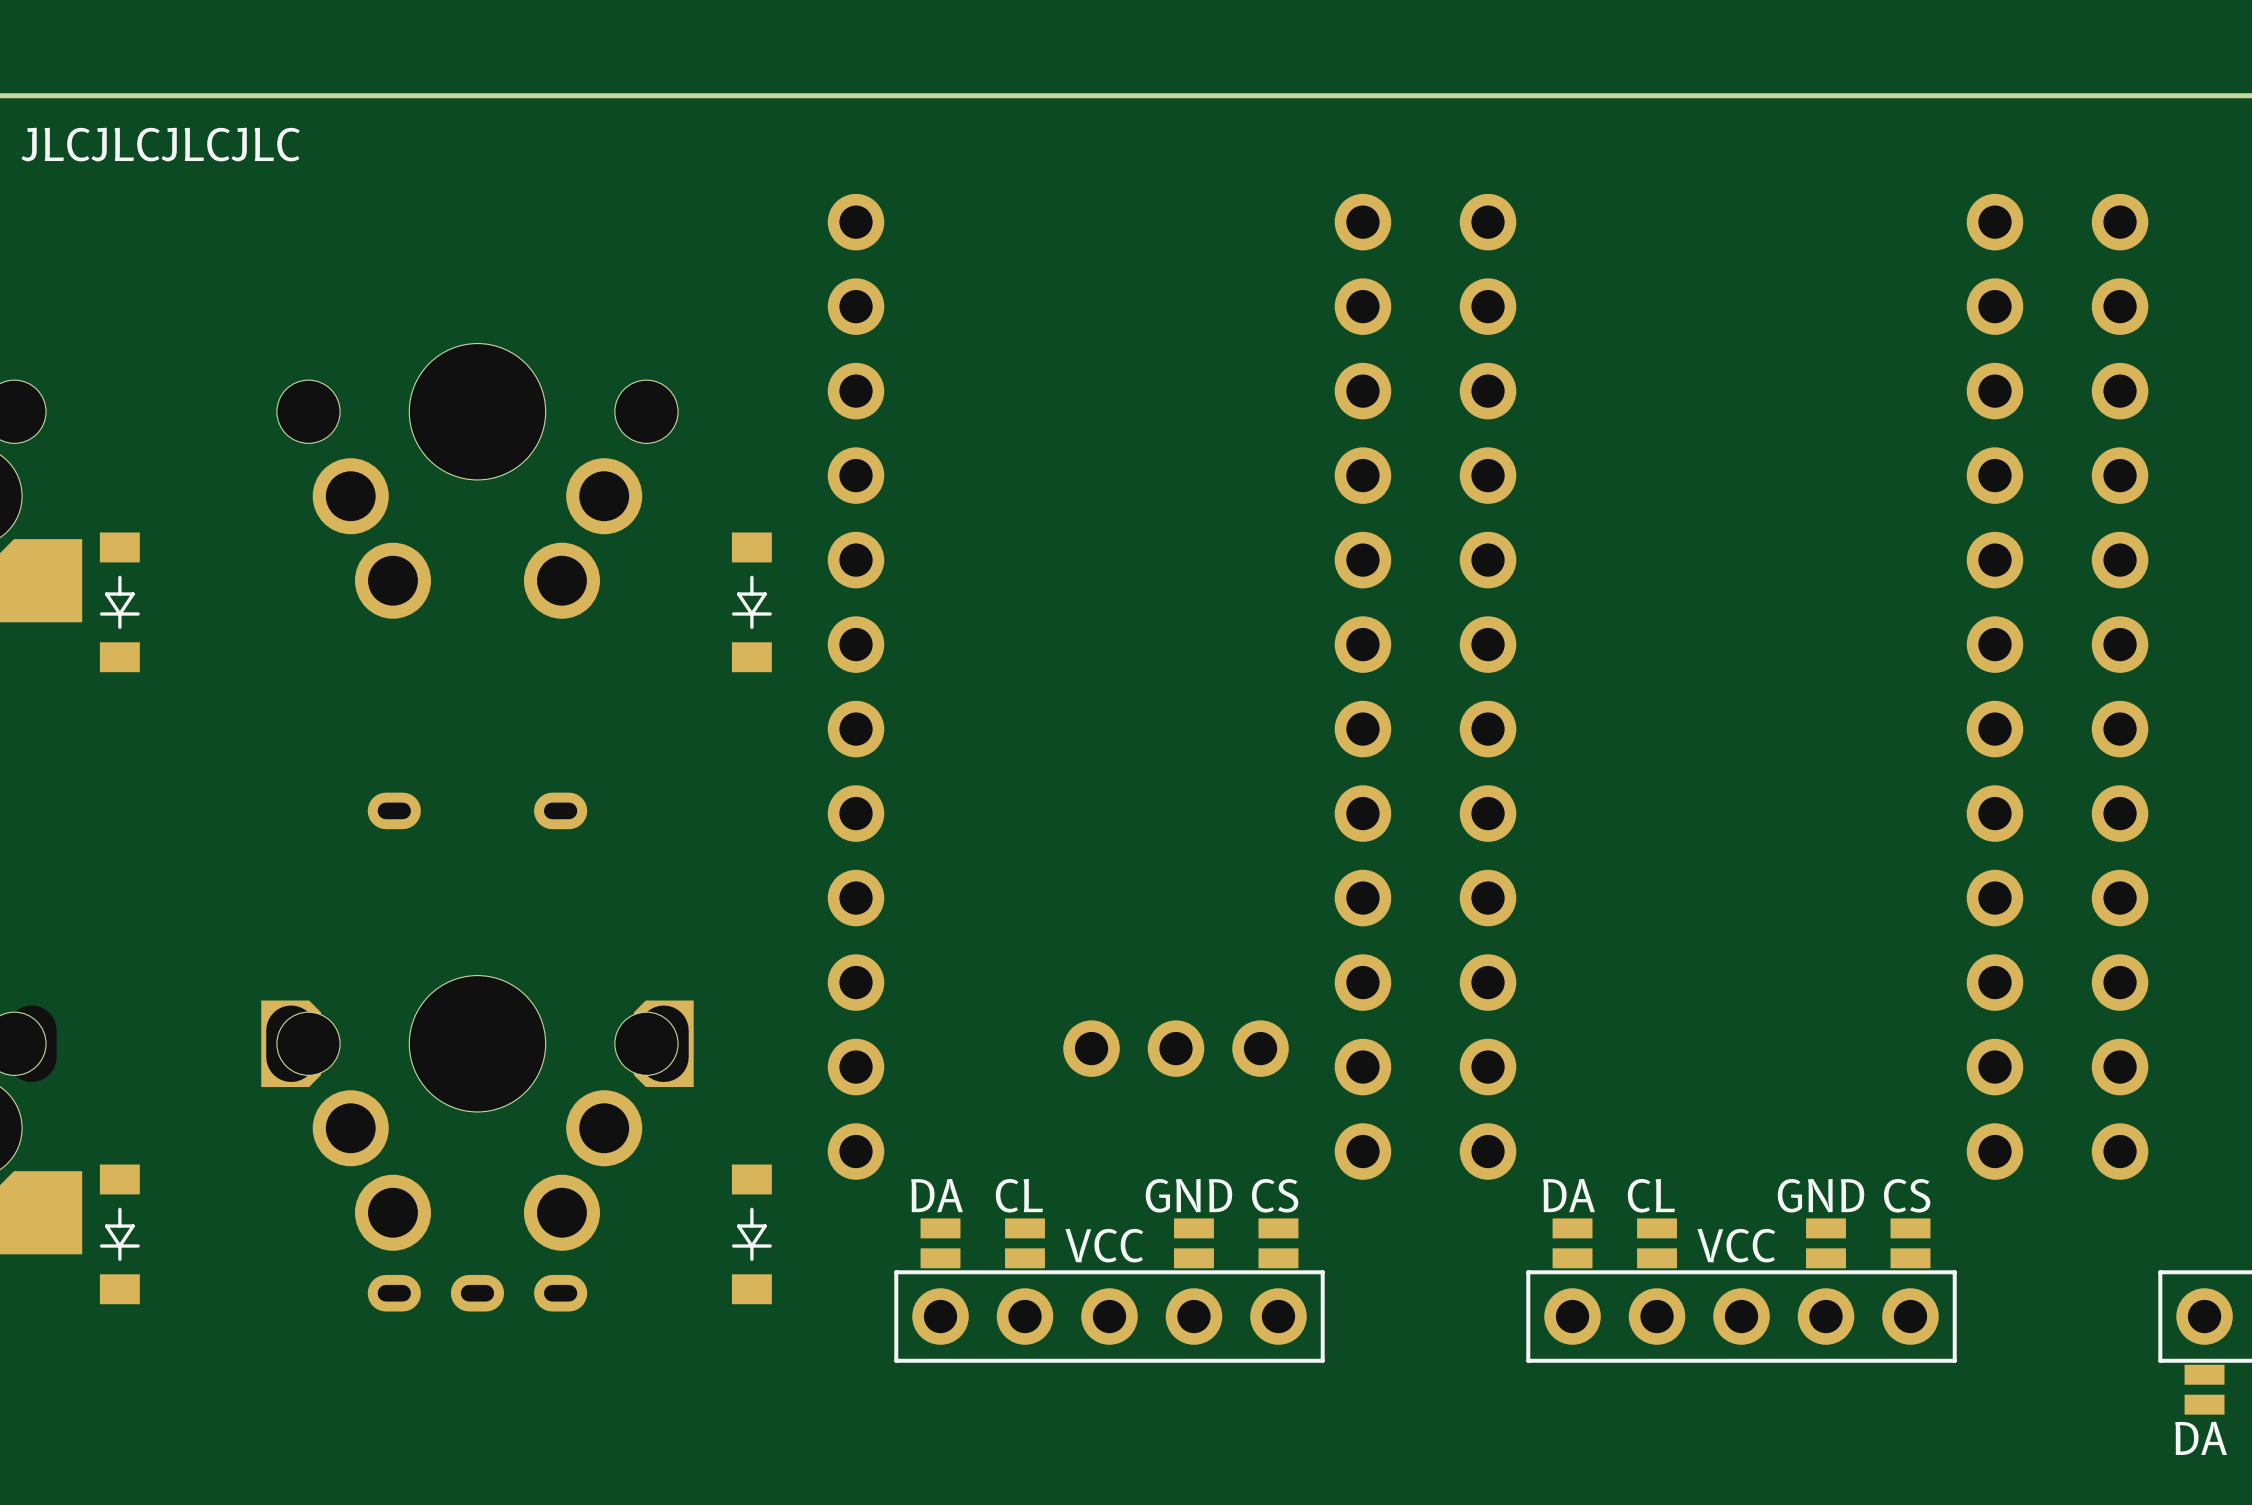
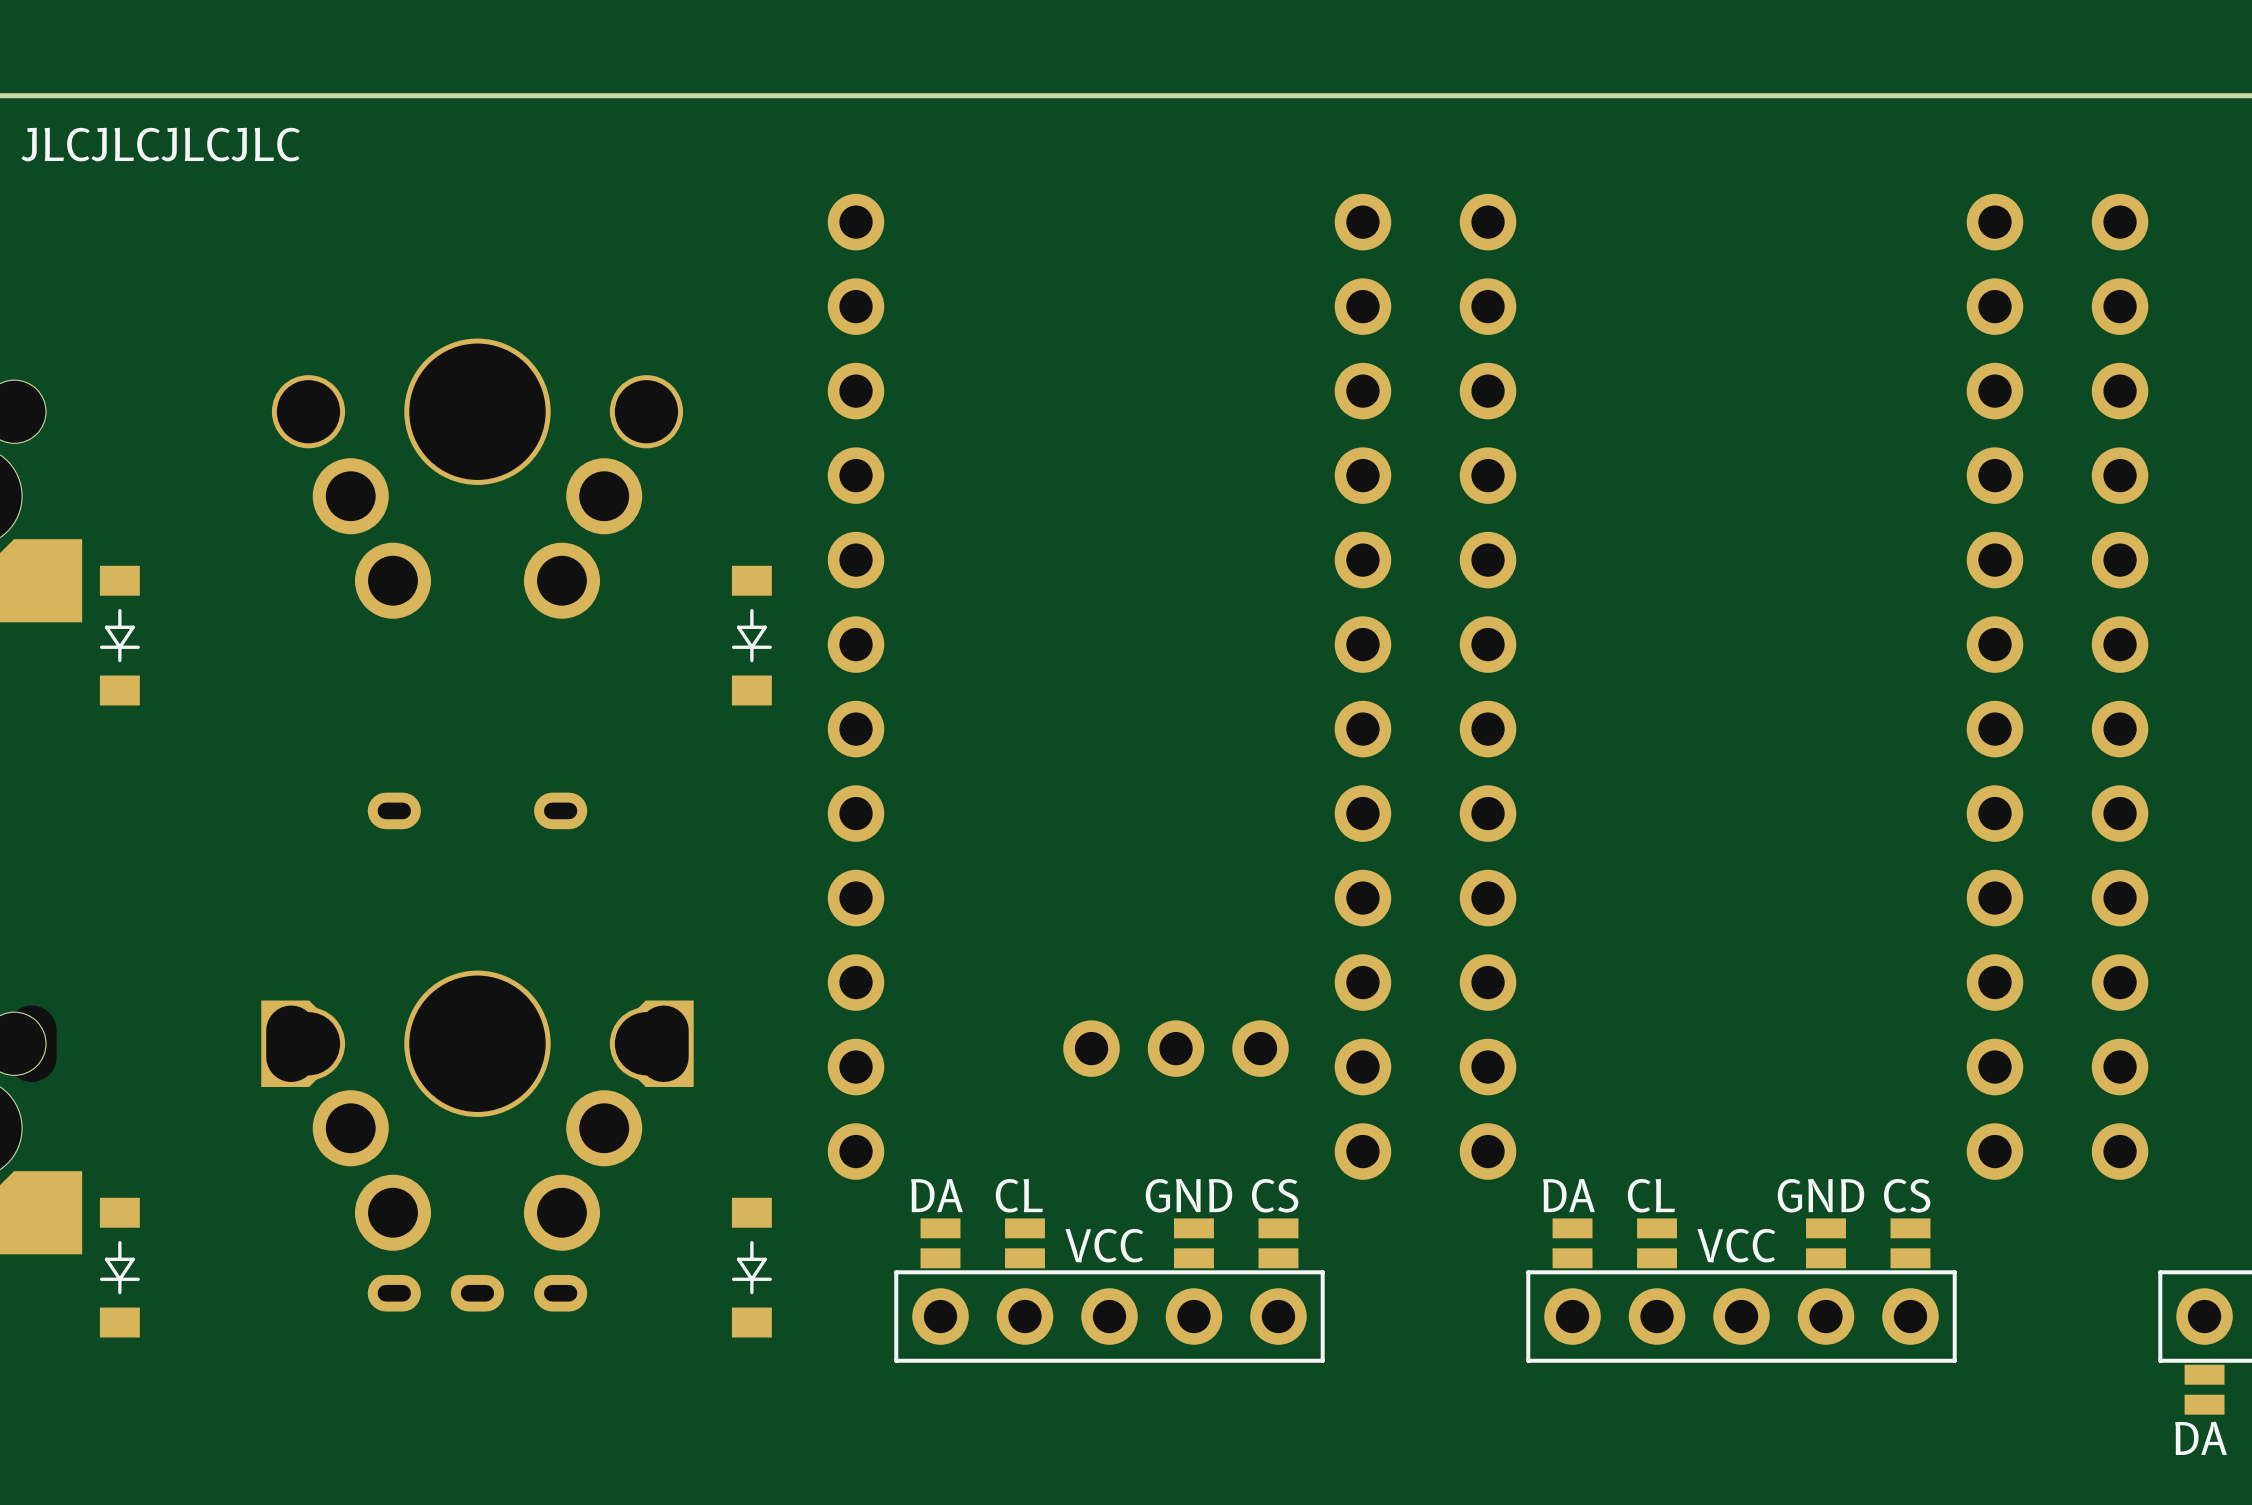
part footprint: [276, 343, 679, 619] -> [271, 338, 684, 619]
part position: (119, 602) -> (119, 635)
part position: (751, 602) -> (751, 635)
part footprint: [276, 975, 679, 1251] -> [271, 970, 684, 1251]
part position: (119, 1234) -> (119, 1267)
part position: (751, 1234) -> (751, 1267)

